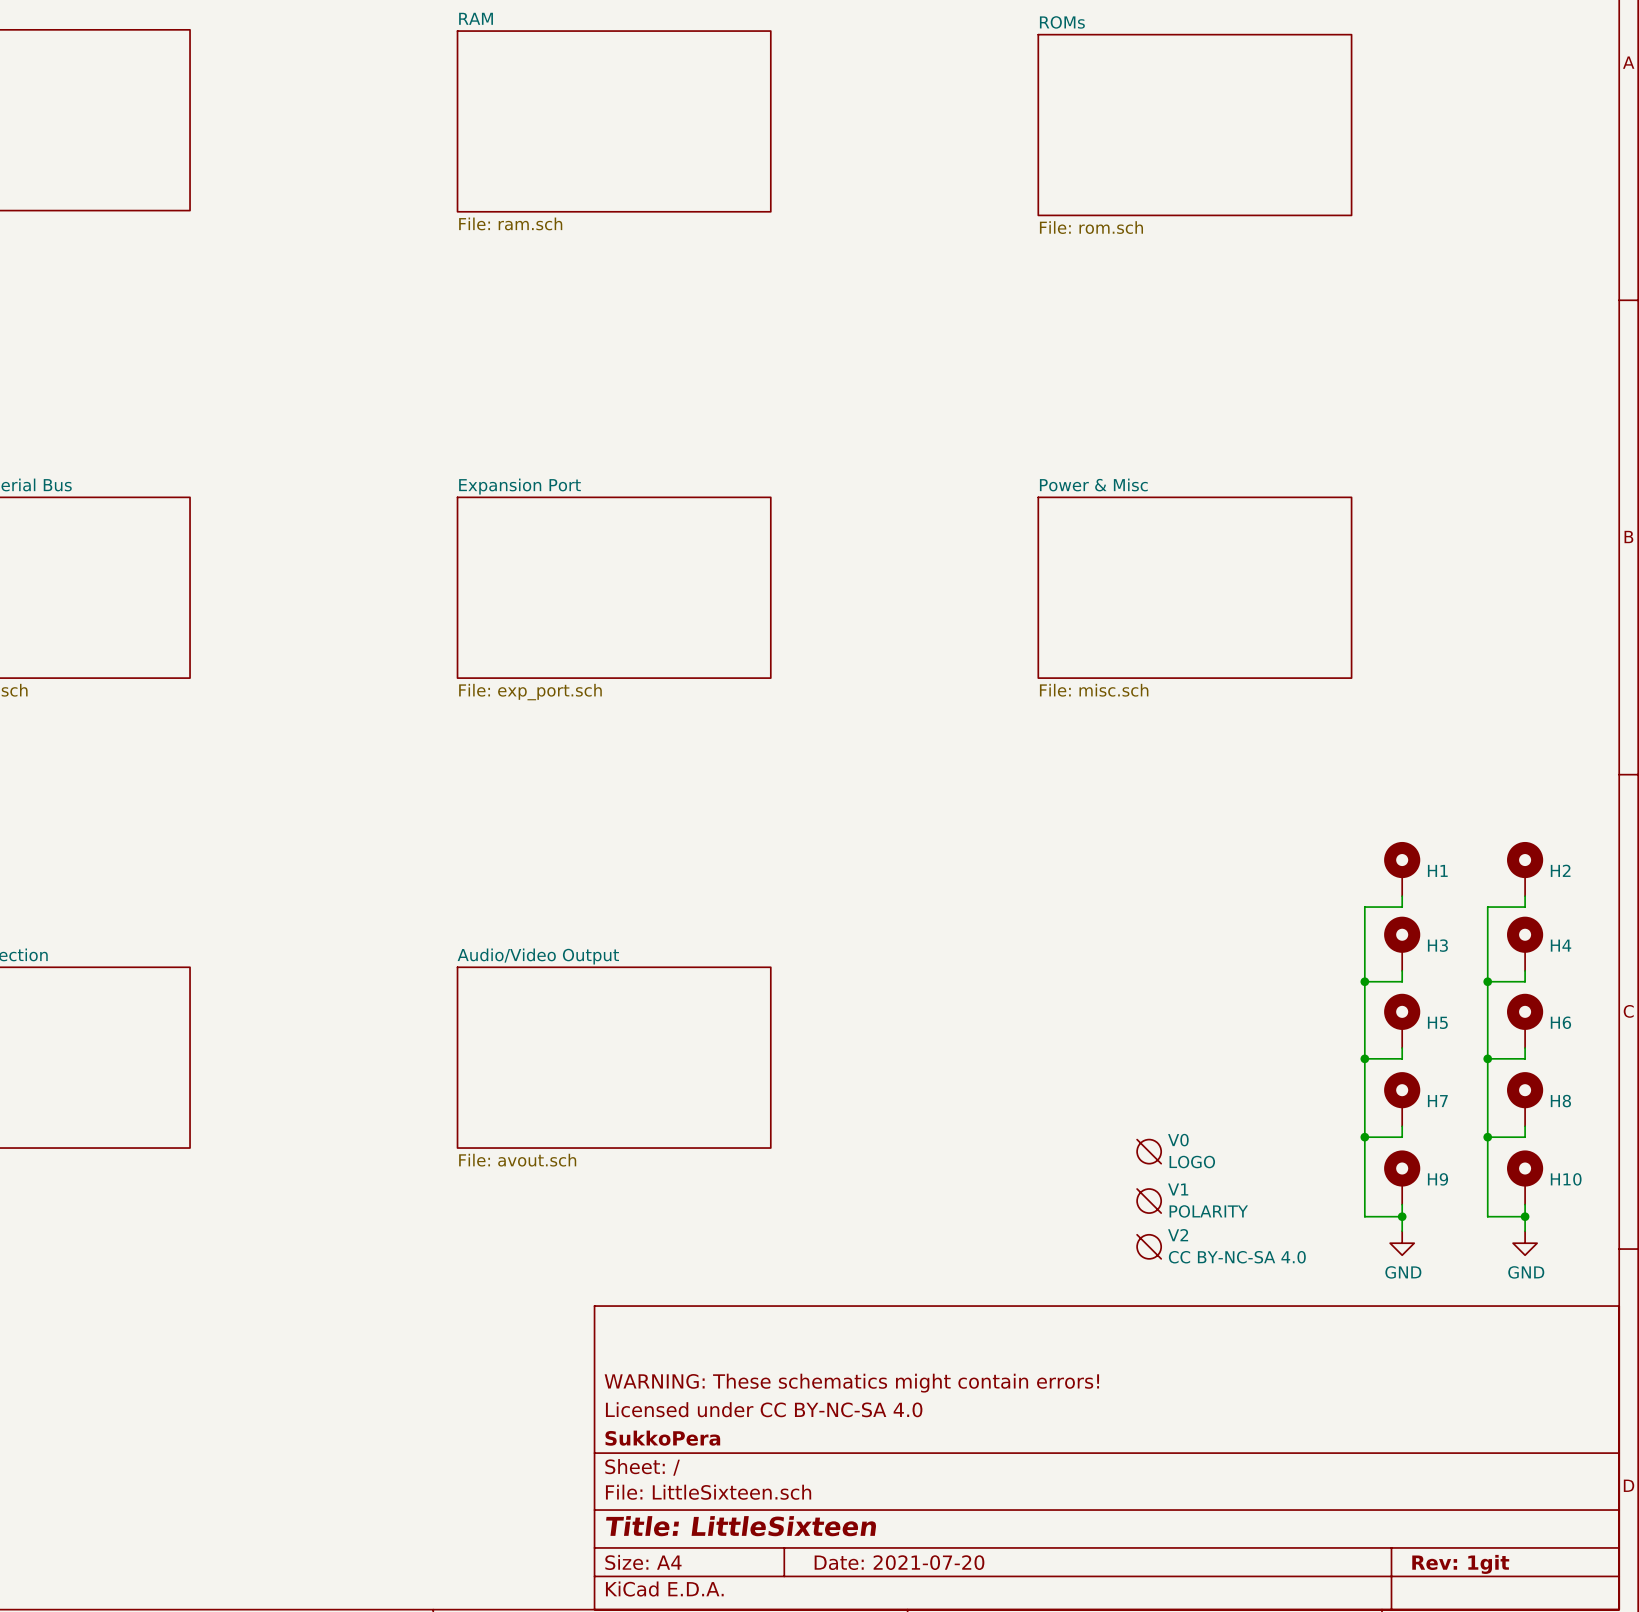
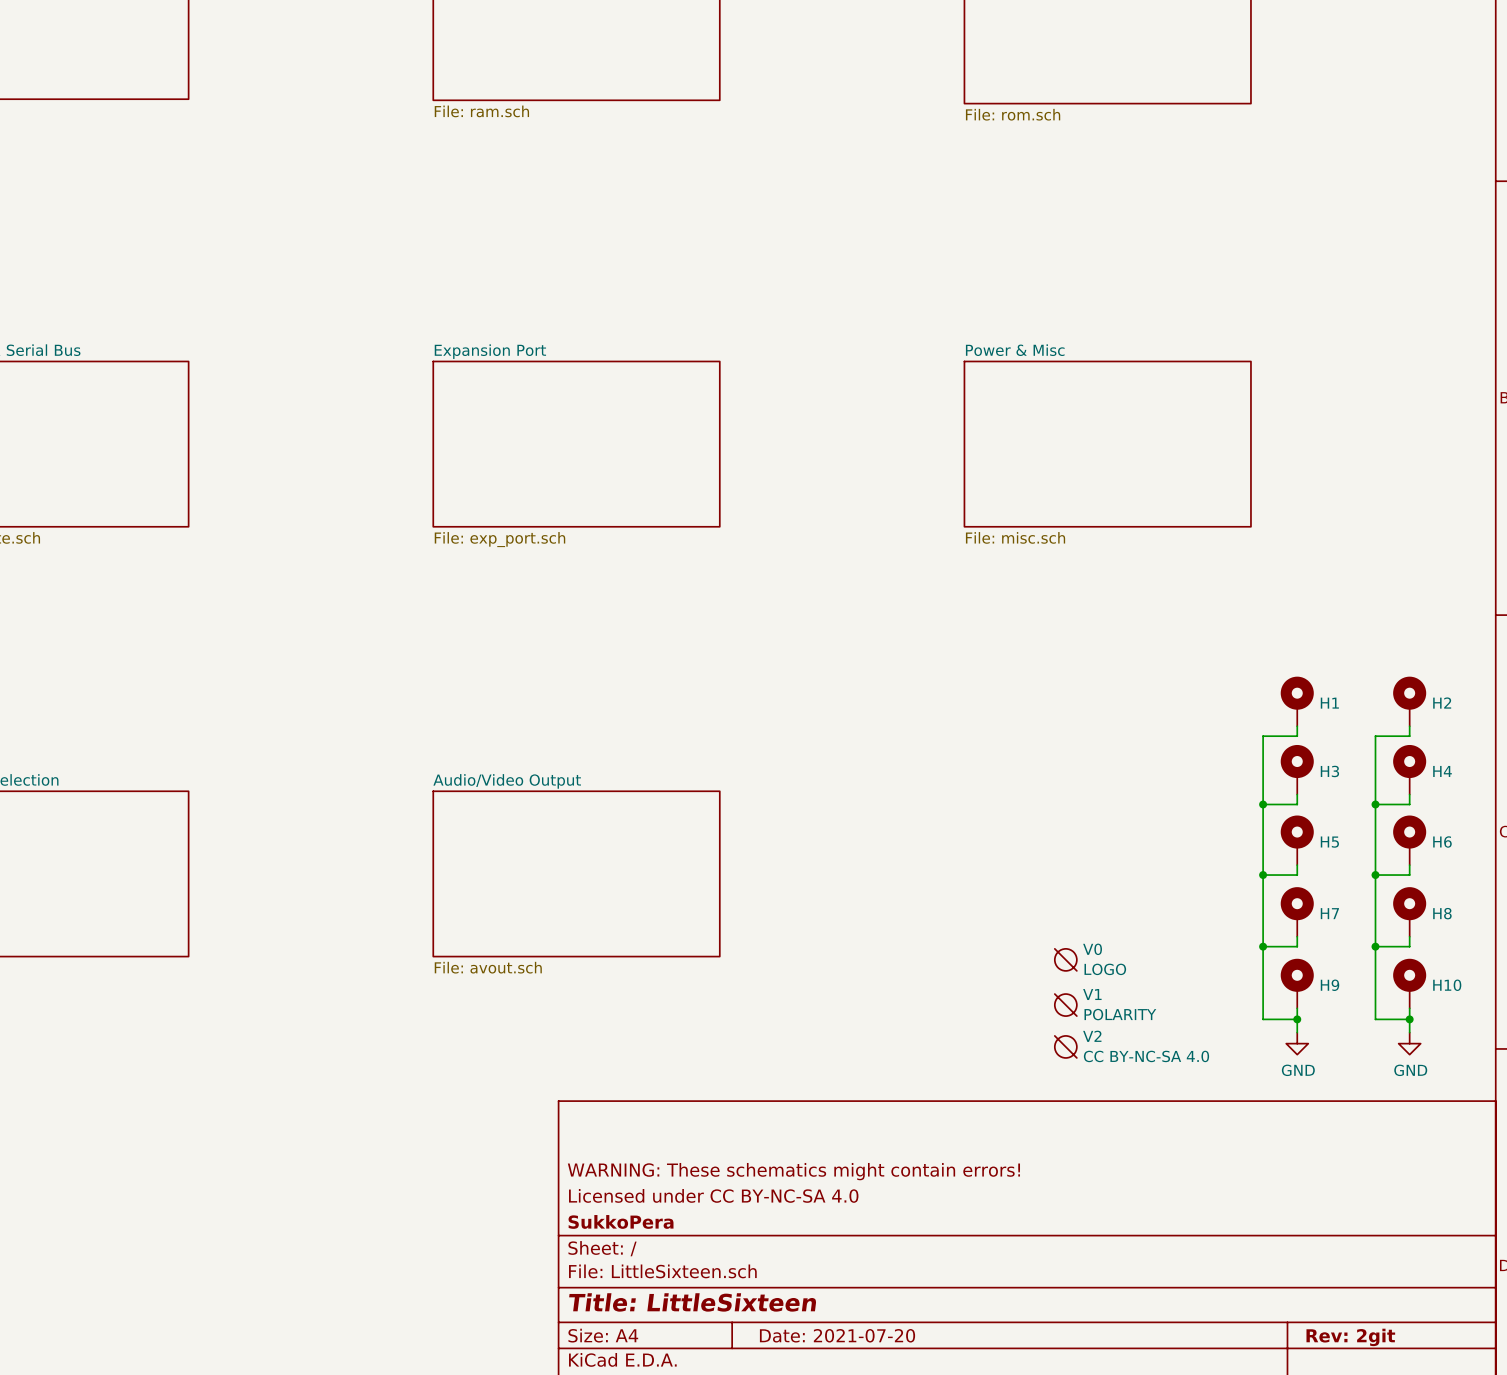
title block: Rev: 1git (1460, 1564) -> Rev: 2git (1350, 1337)

